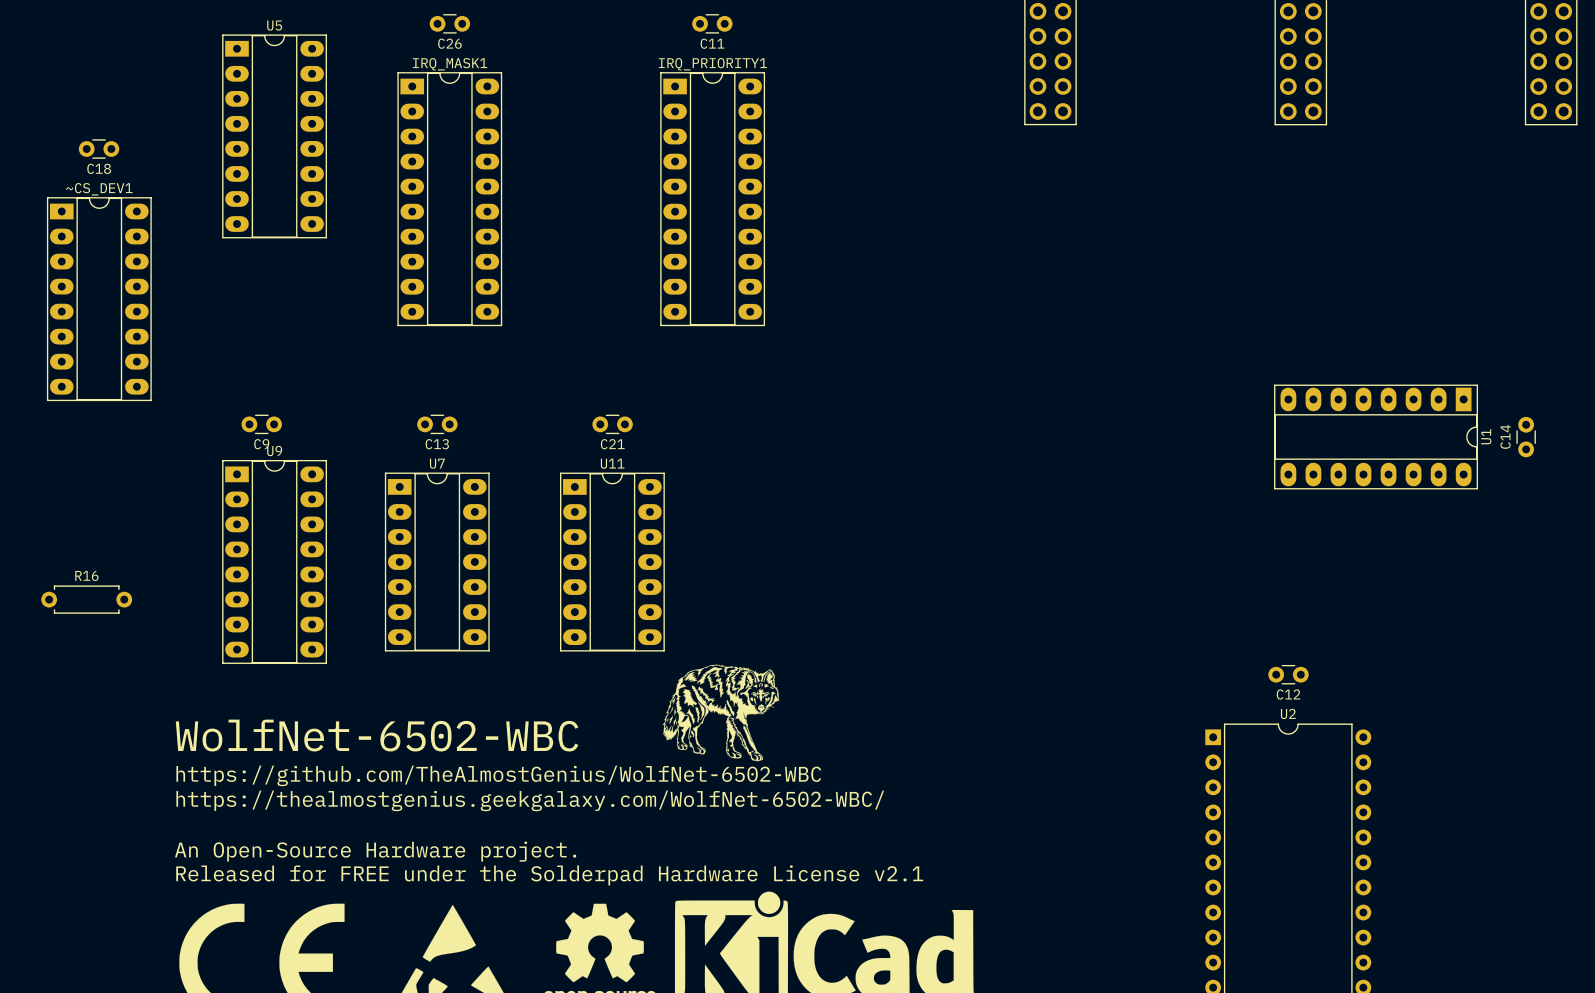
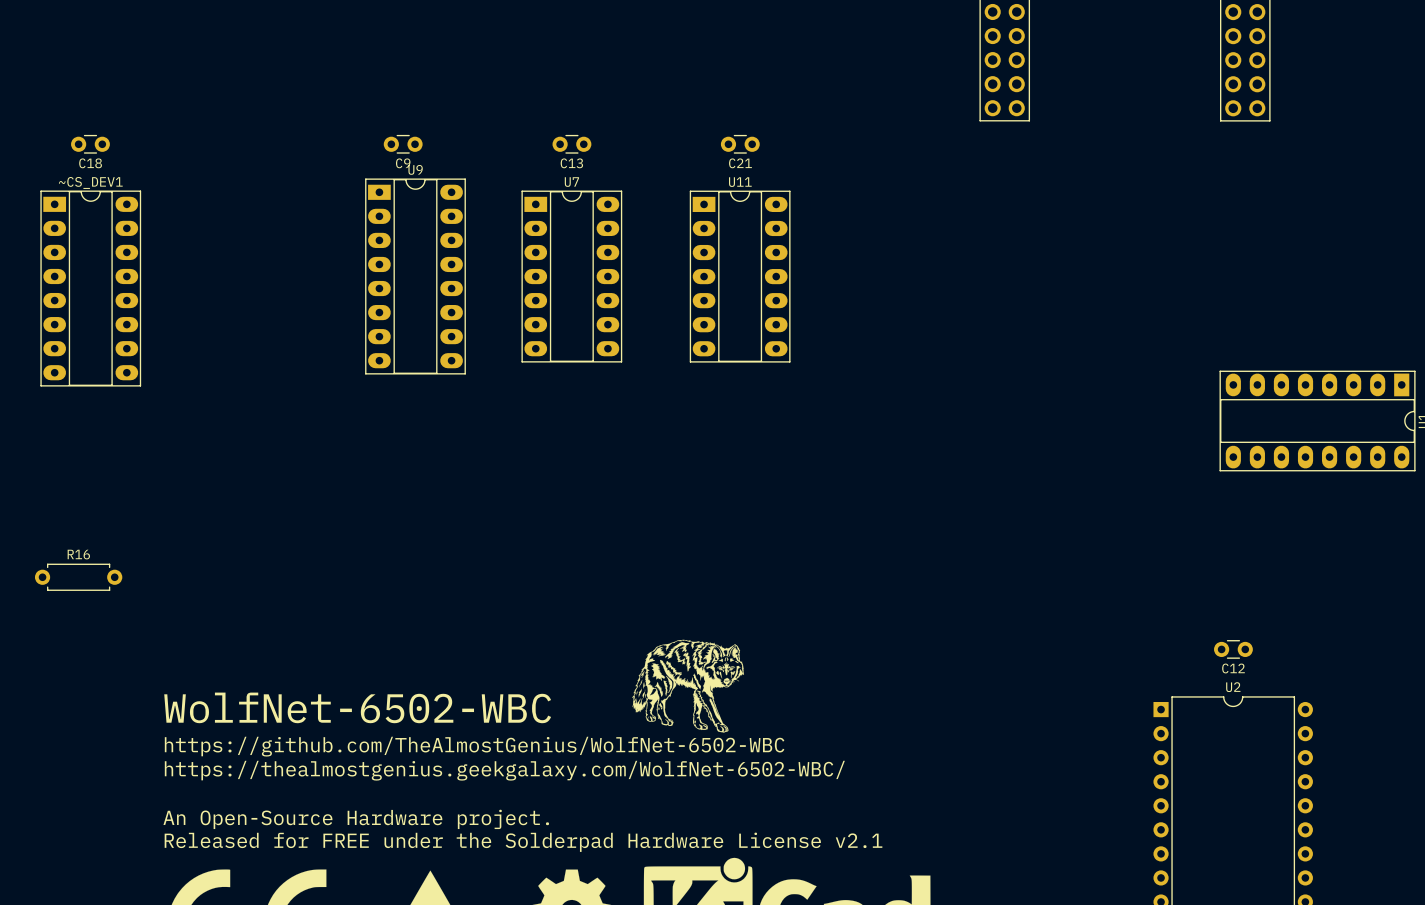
C26: (449, 23) -> none
C11: (712, 23) -> none
U5: (274, 136) -> none
IRQ_MASK1: (449, 199) -> none
IRQ_PRIORITY1: (712, 199) -> none
C9 position: (261, 424) -> (403, 144)
C13 position: (437, 424) -> (571, 144)
C21 position: (612, 424) -> (740, 144)
U9 position: (274, 561) -> (415, 276)
U7 position: (437, 562) -> (571, 276)
U11 position: (612, 562) -> (740, 276)

